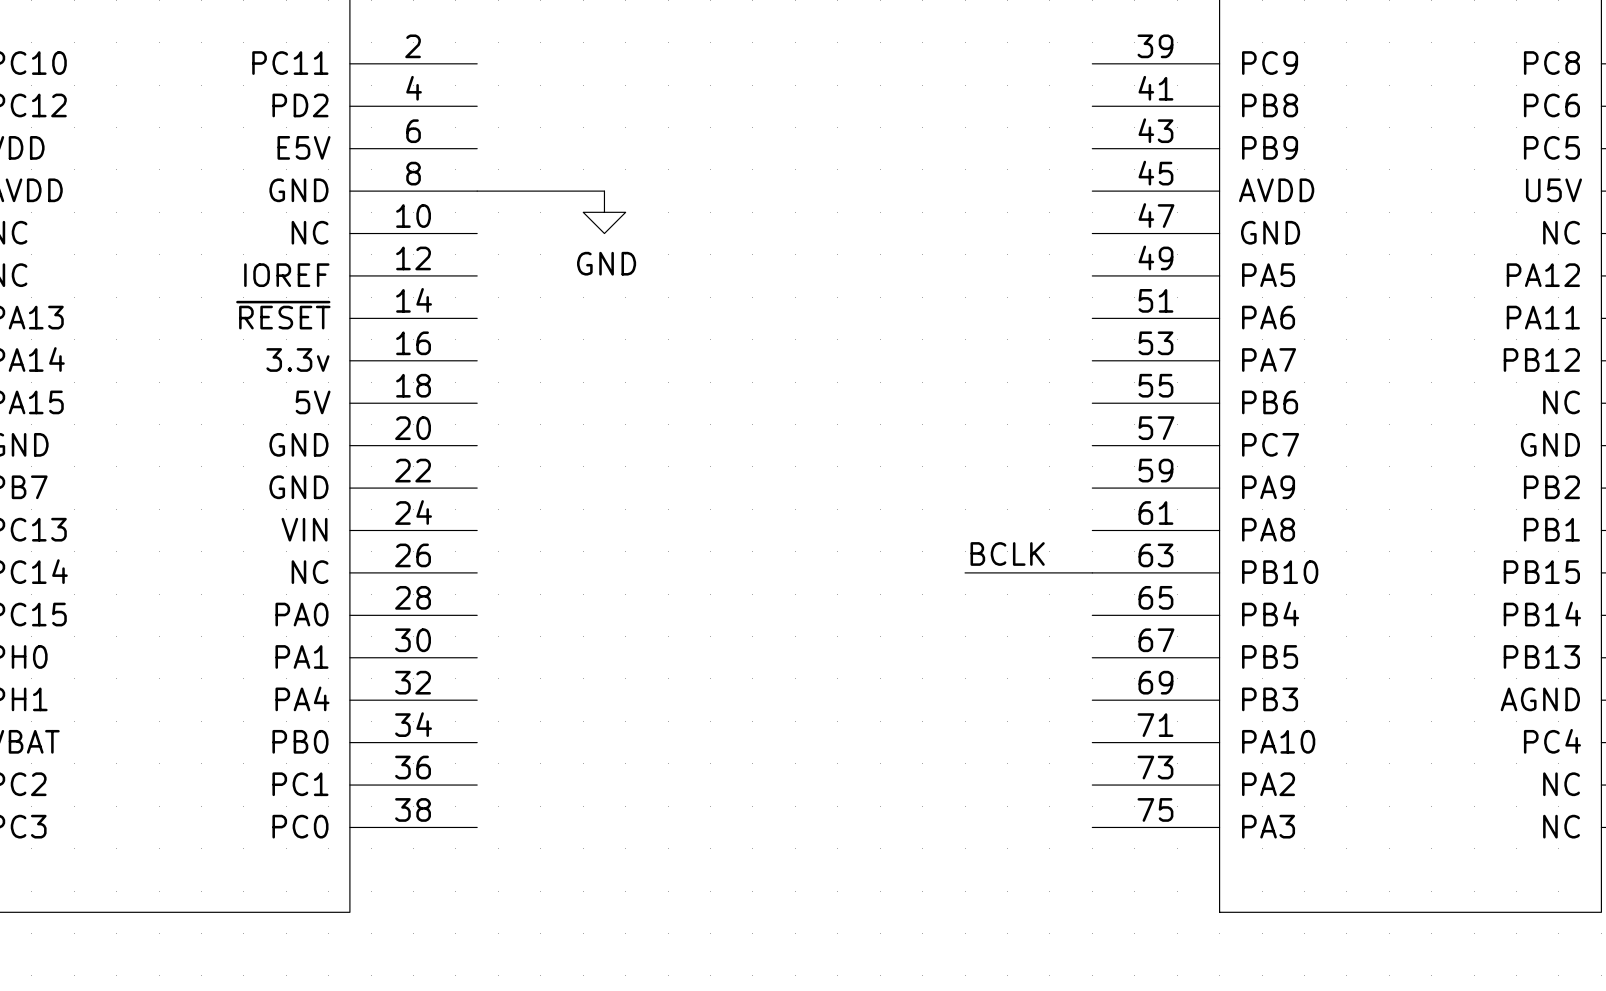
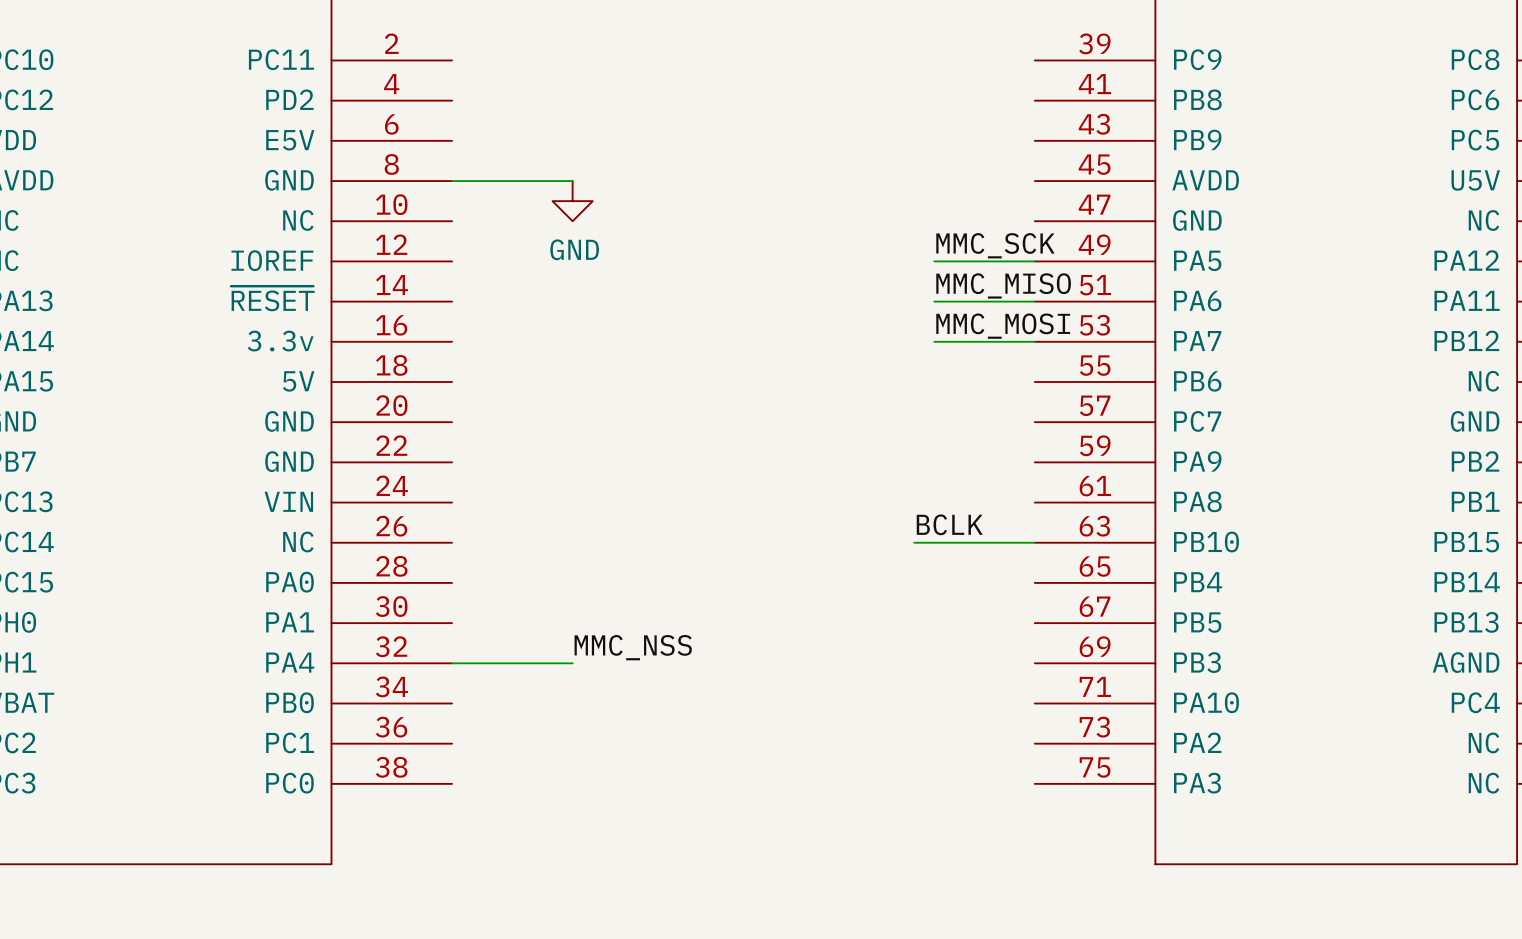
label: none -> MMC_SCK (995, 245)
wire: none -> (934, 261) (1034, 261)
label: none -> MMC_MISO (1003, 285)
wire: none -> (934, 301) (1034, 301)
label: none -> MMC_MOSI (1003, 326)
wire: none -> (934, 341) (1034, 341)
label: none -> MMC_NSS (633, 647)
wire: none -> (452, 663) (572, 663)

